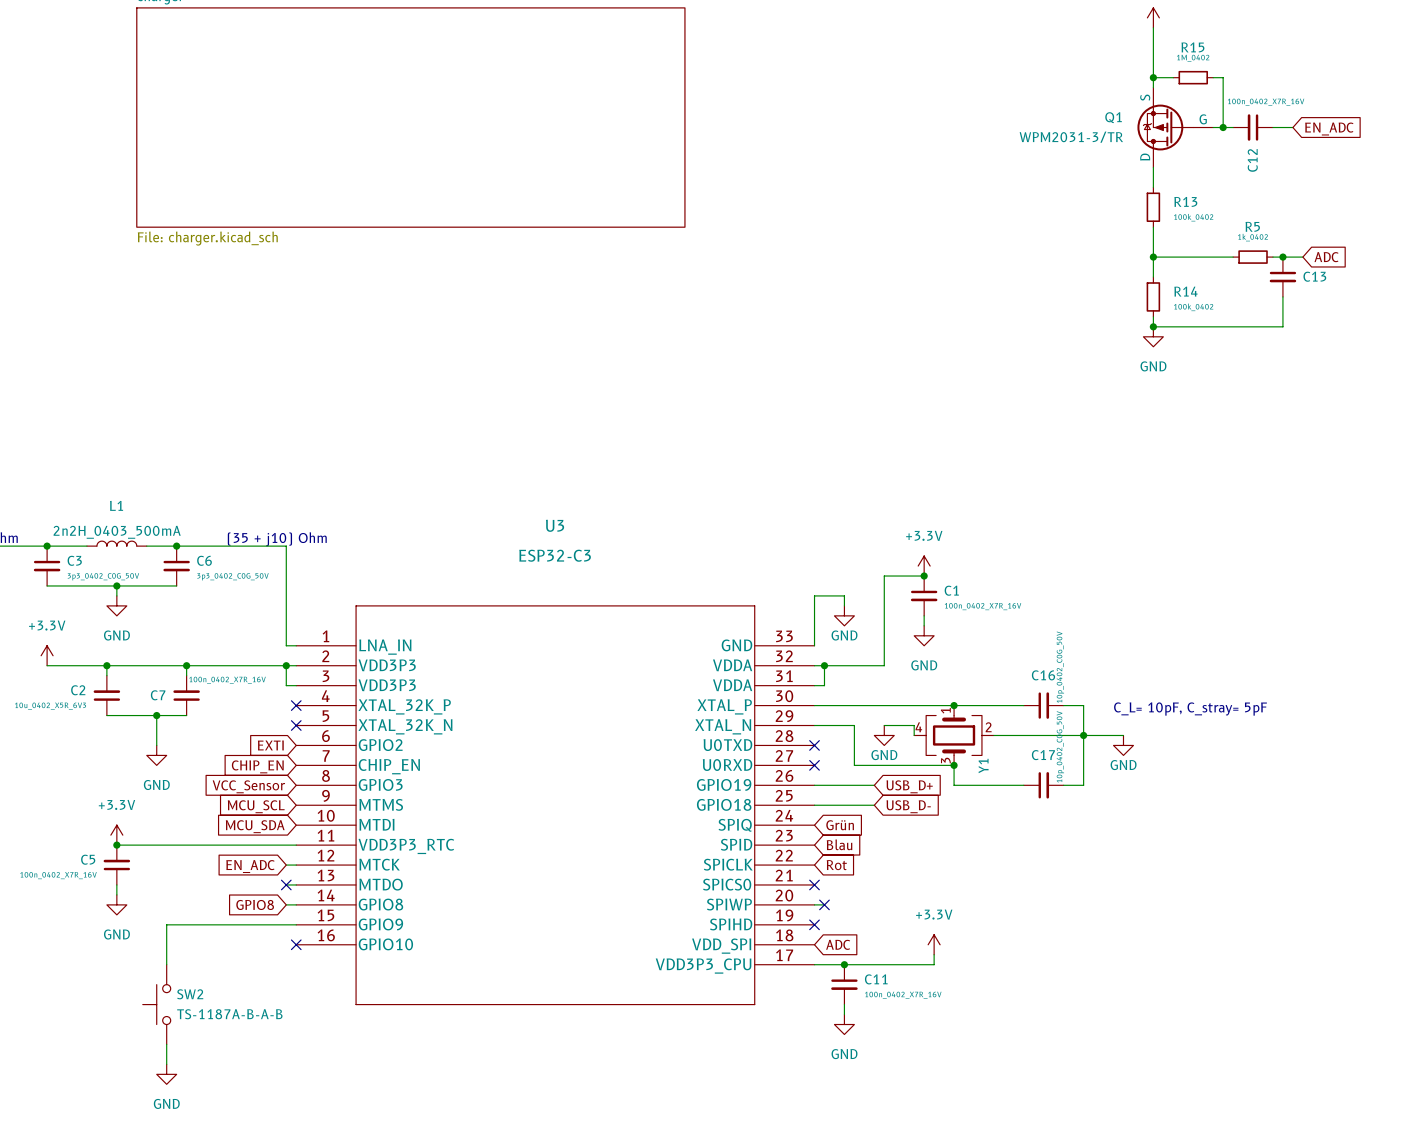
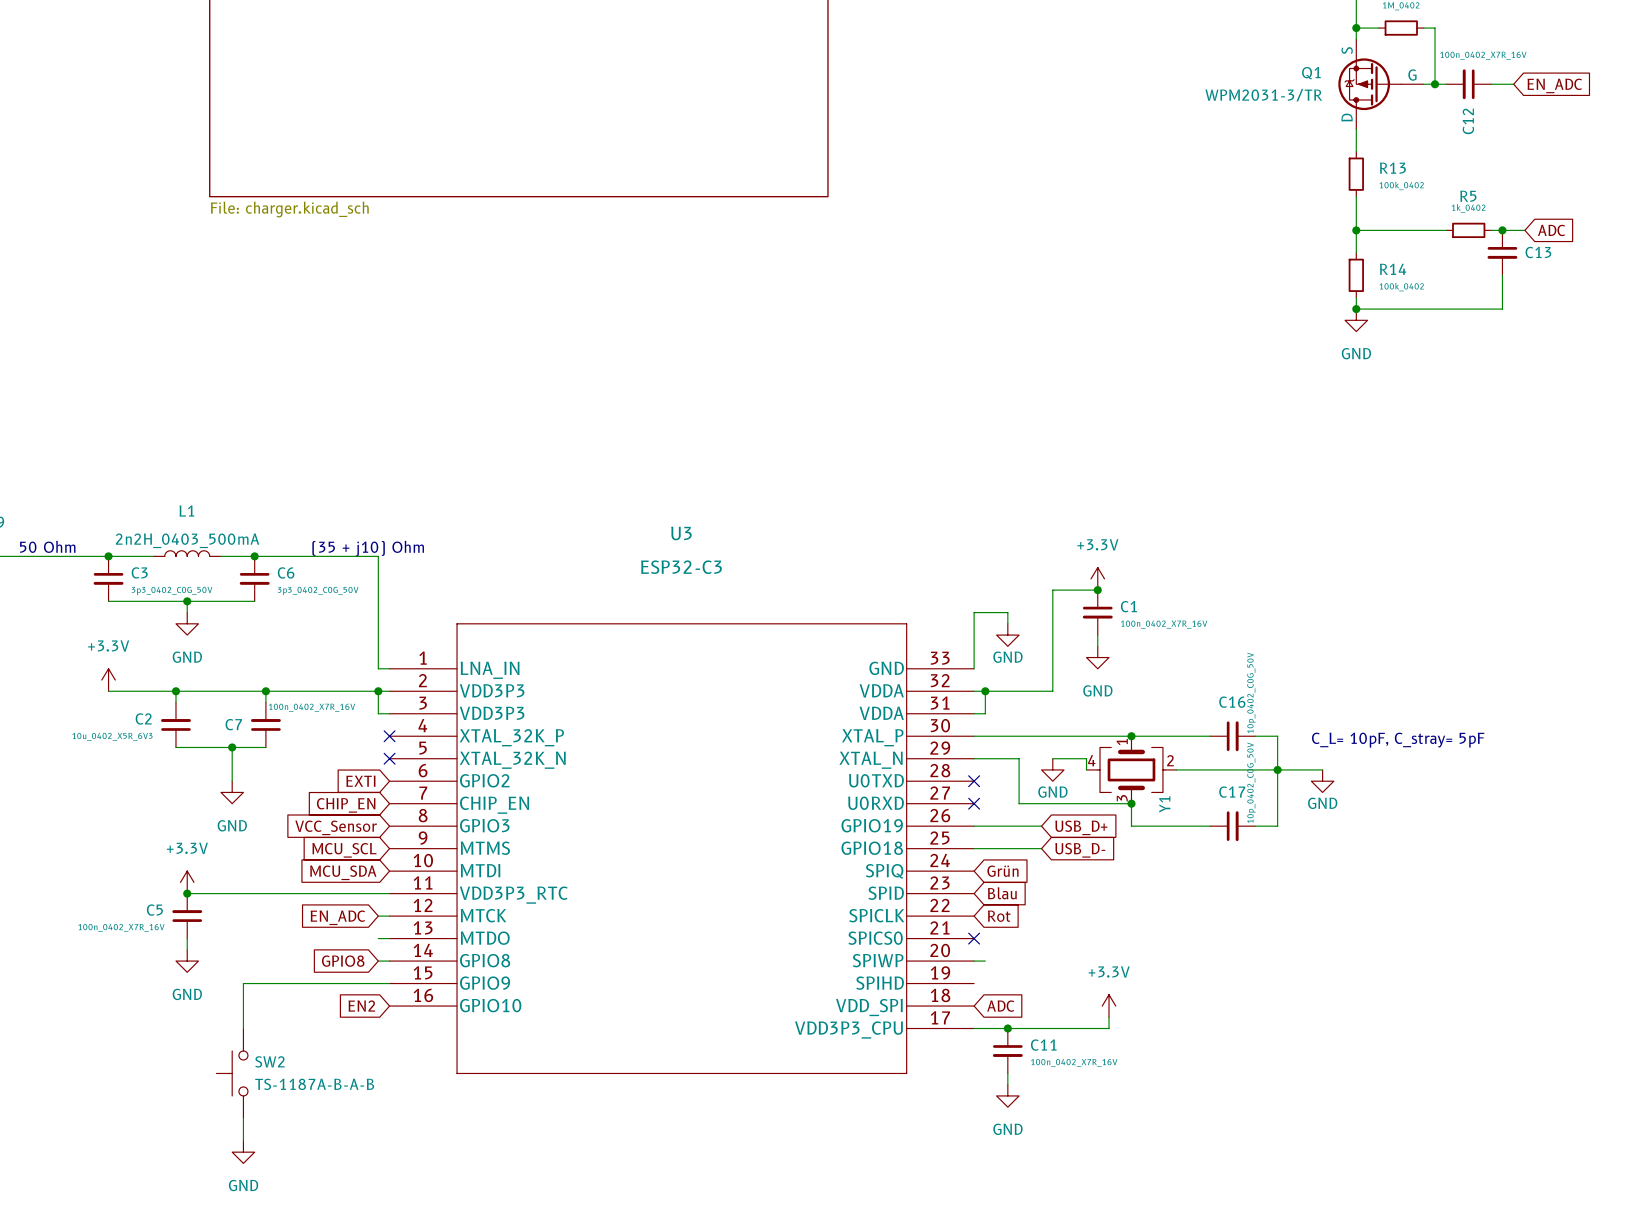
no-connect mark: (286, 884) -> none
no-connect mark: (824, 904) -> none
no-connect mark: (814, 924) -> none
global label: none -> EN2 (361, 1006)
no-connect mark: (296, 944) -> none

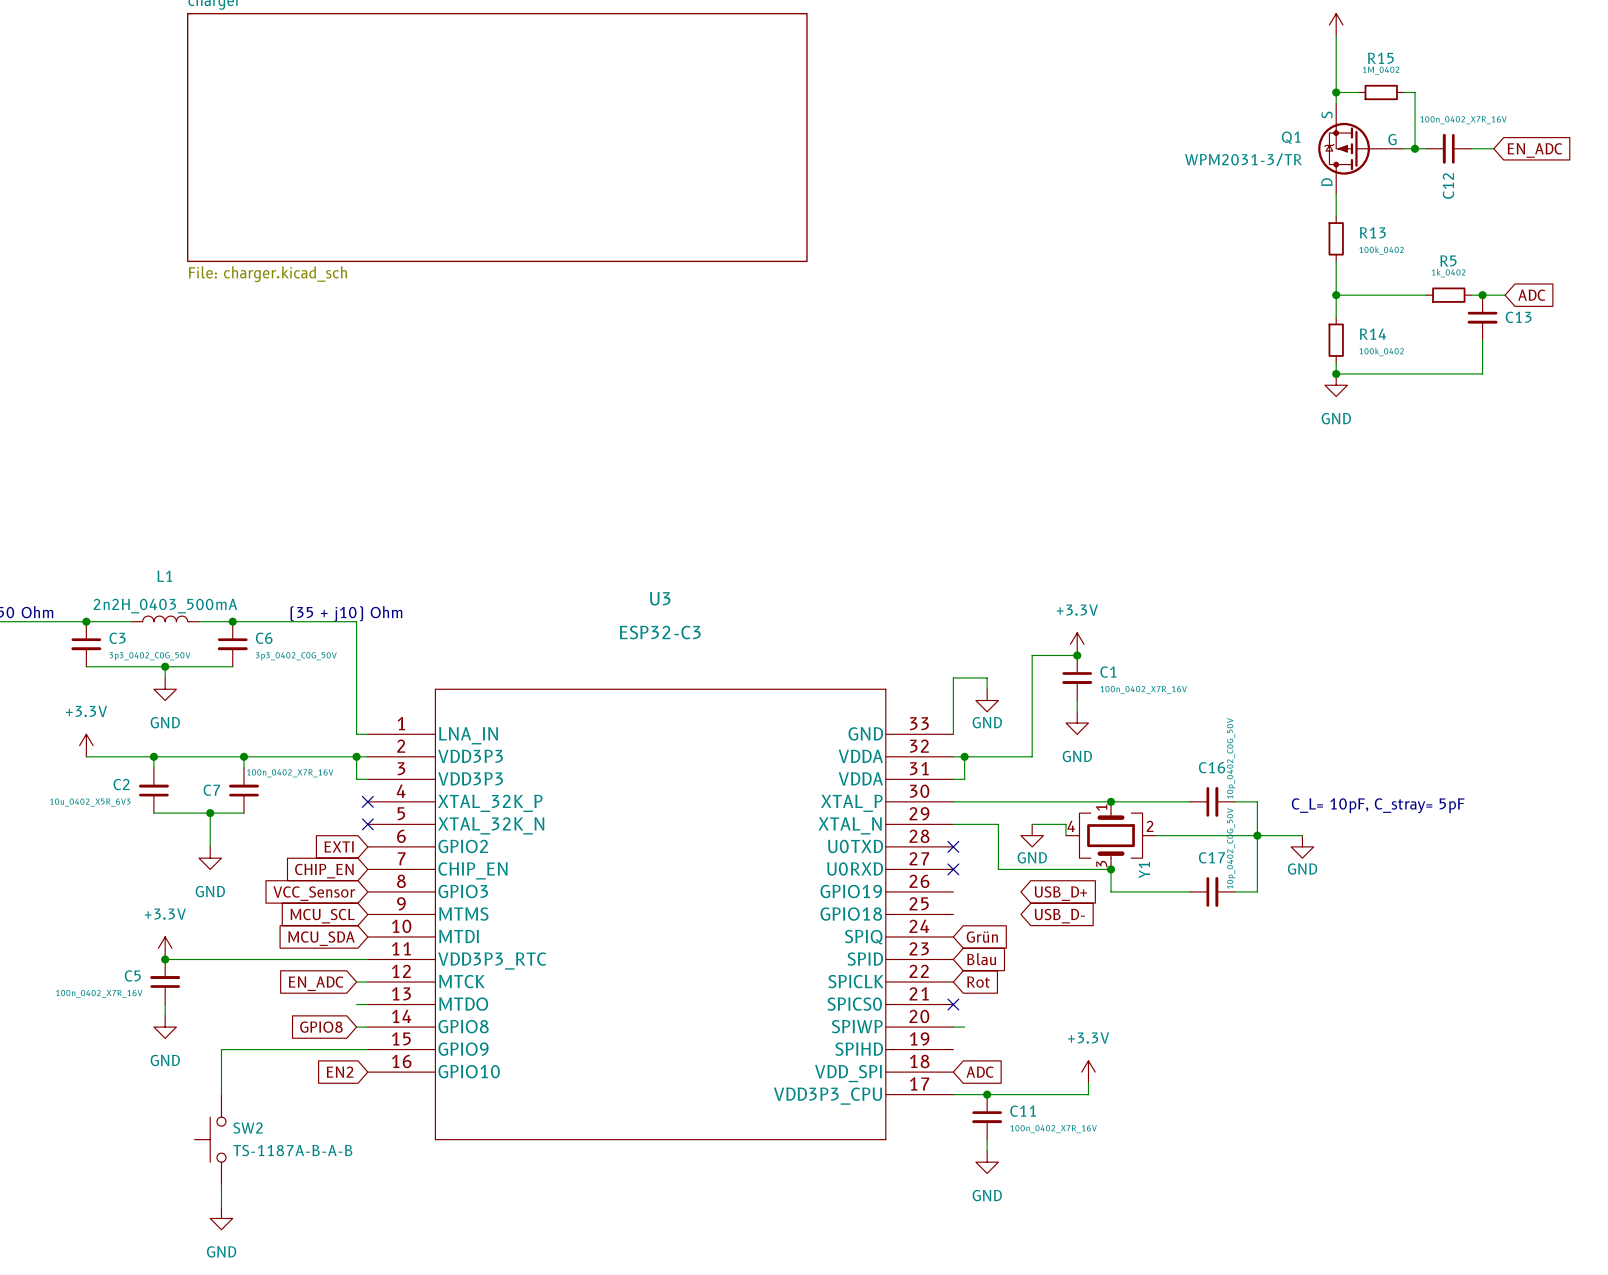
wire: (974, 826) (1041, 826) -> none
wire: (974, 848) (1041, 848) -> none

